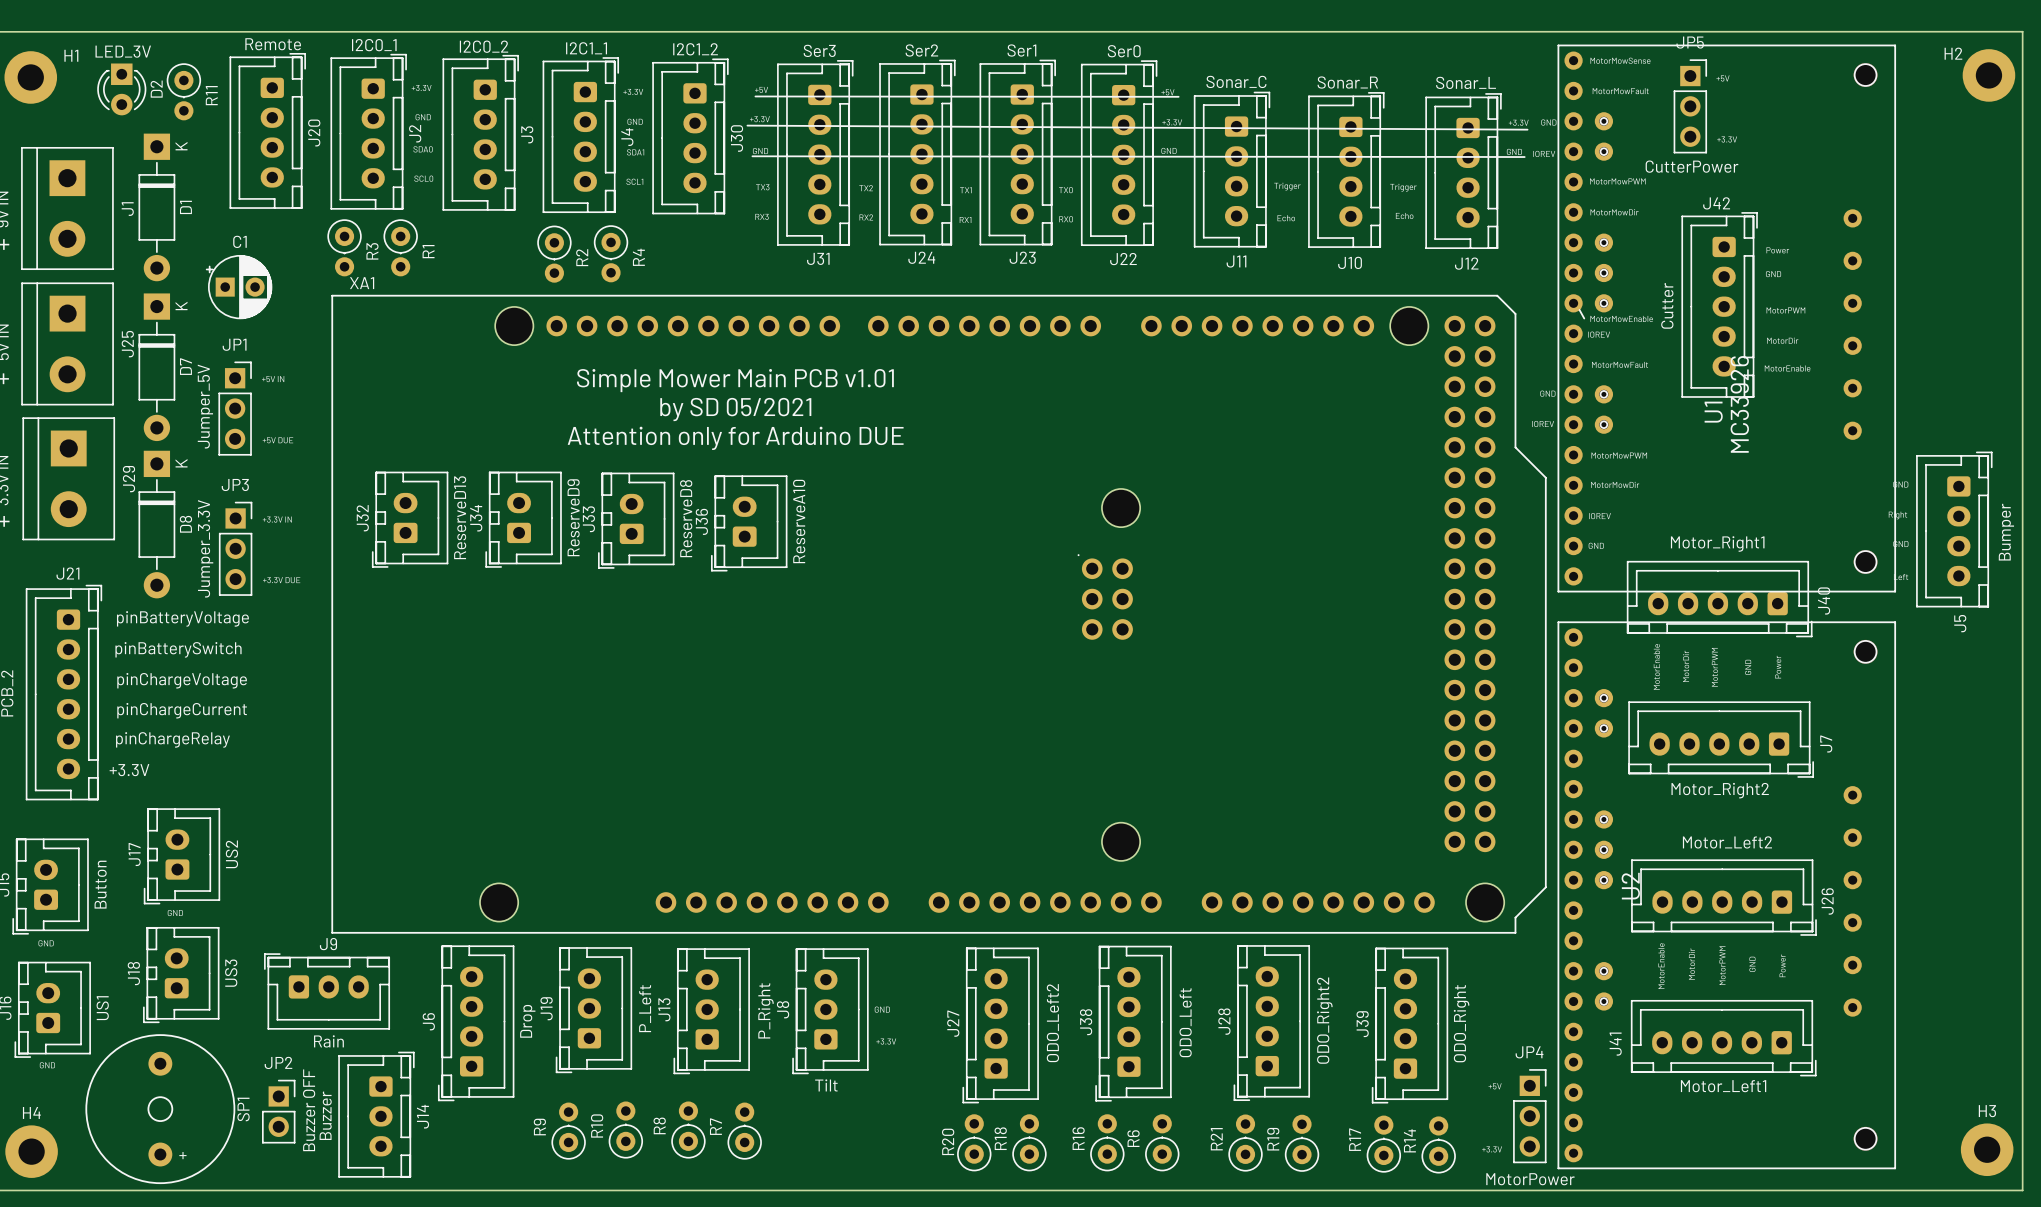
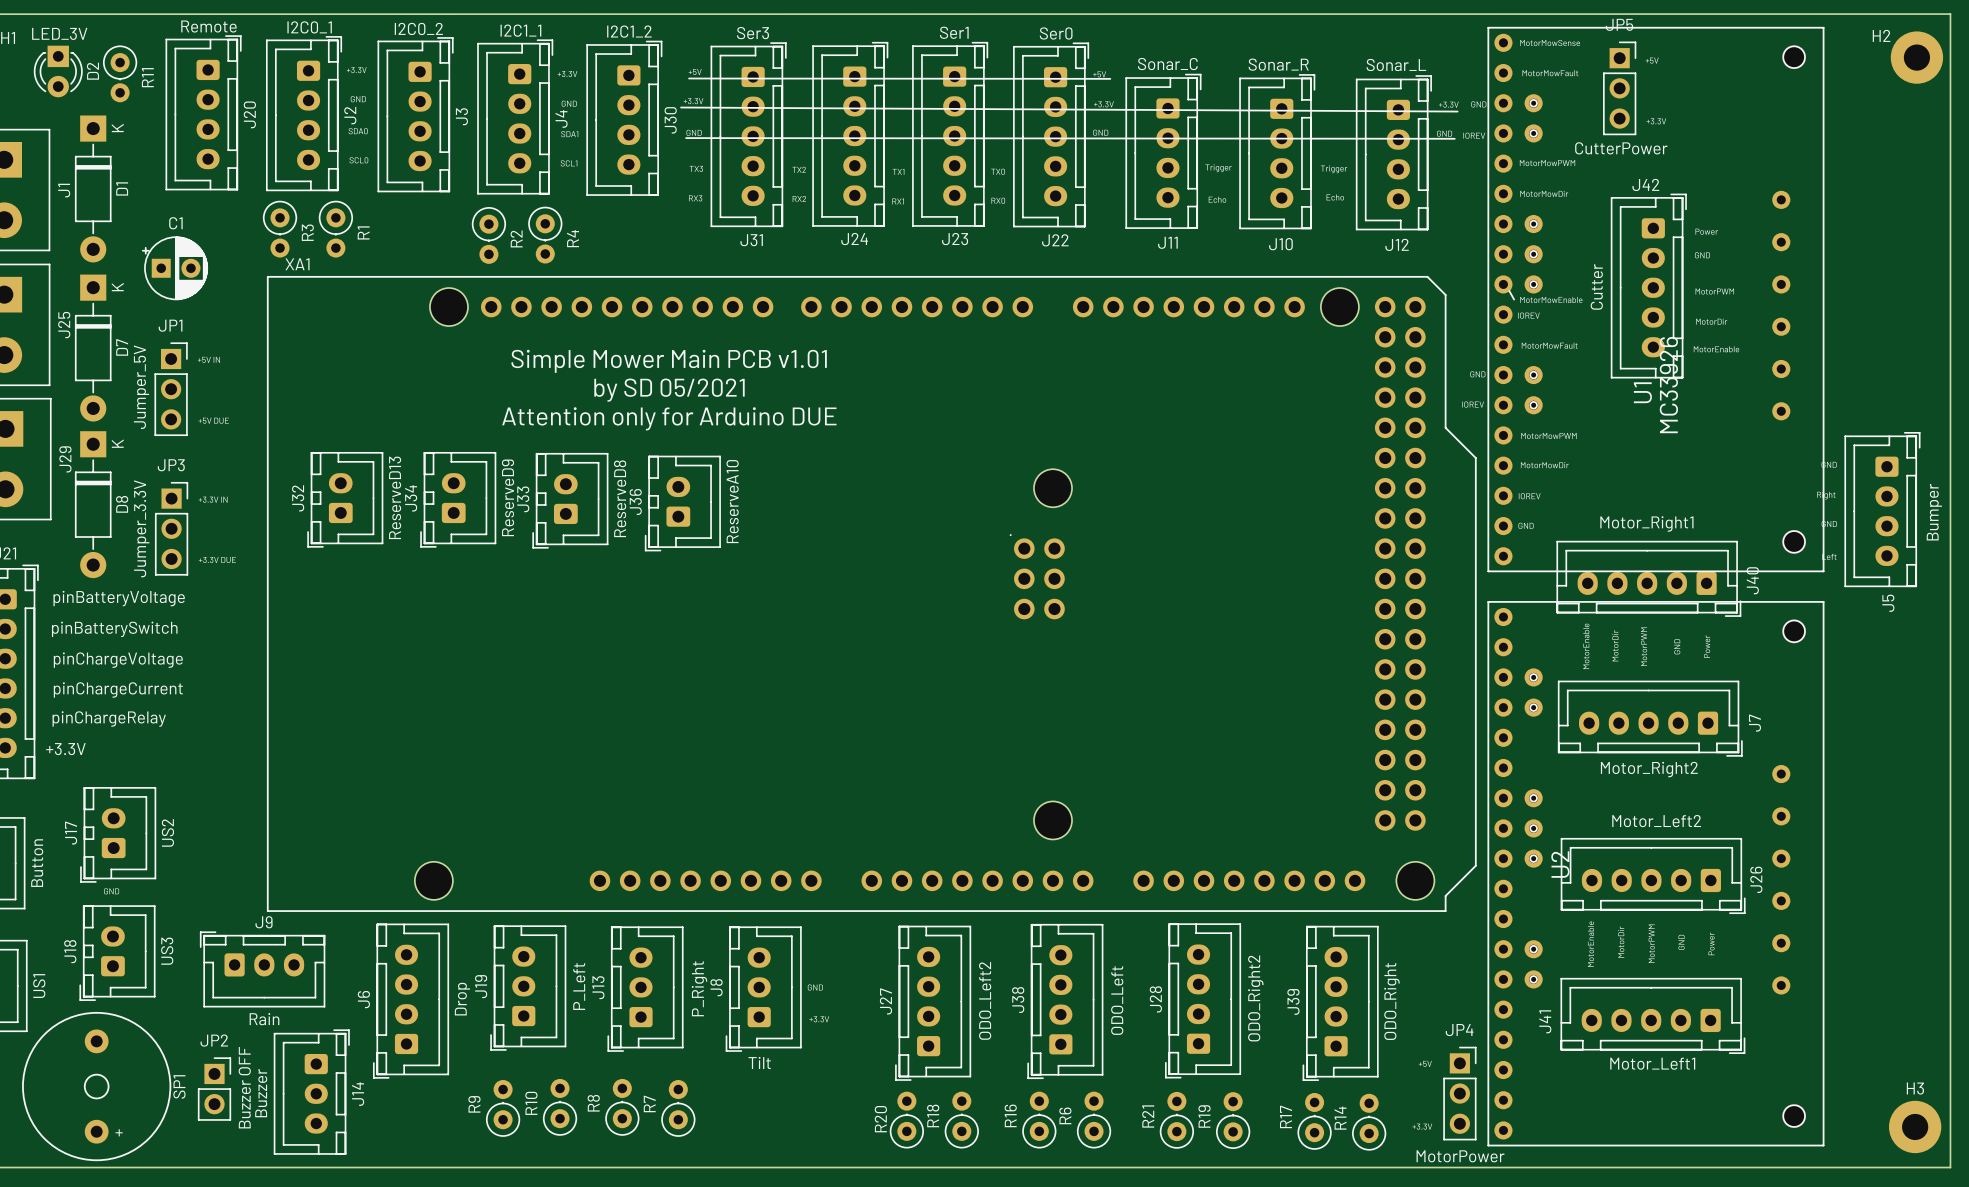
J24 value: Ser2 (921, 50) -> none

